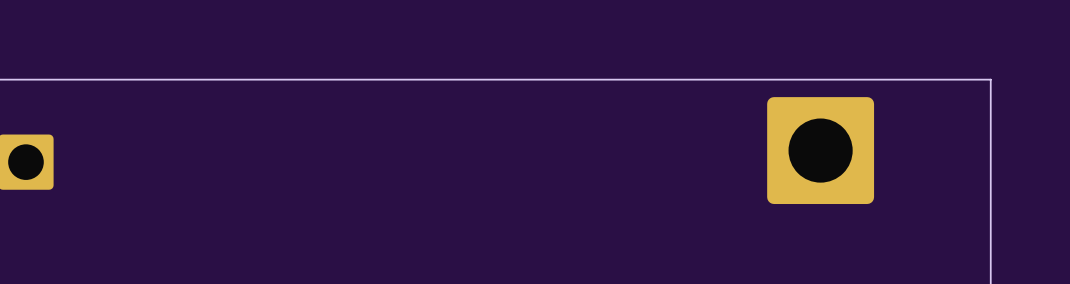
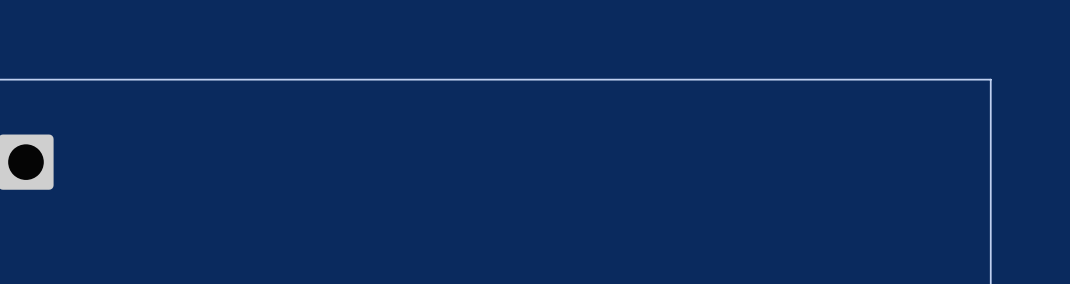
part: (820, 150) -> none

